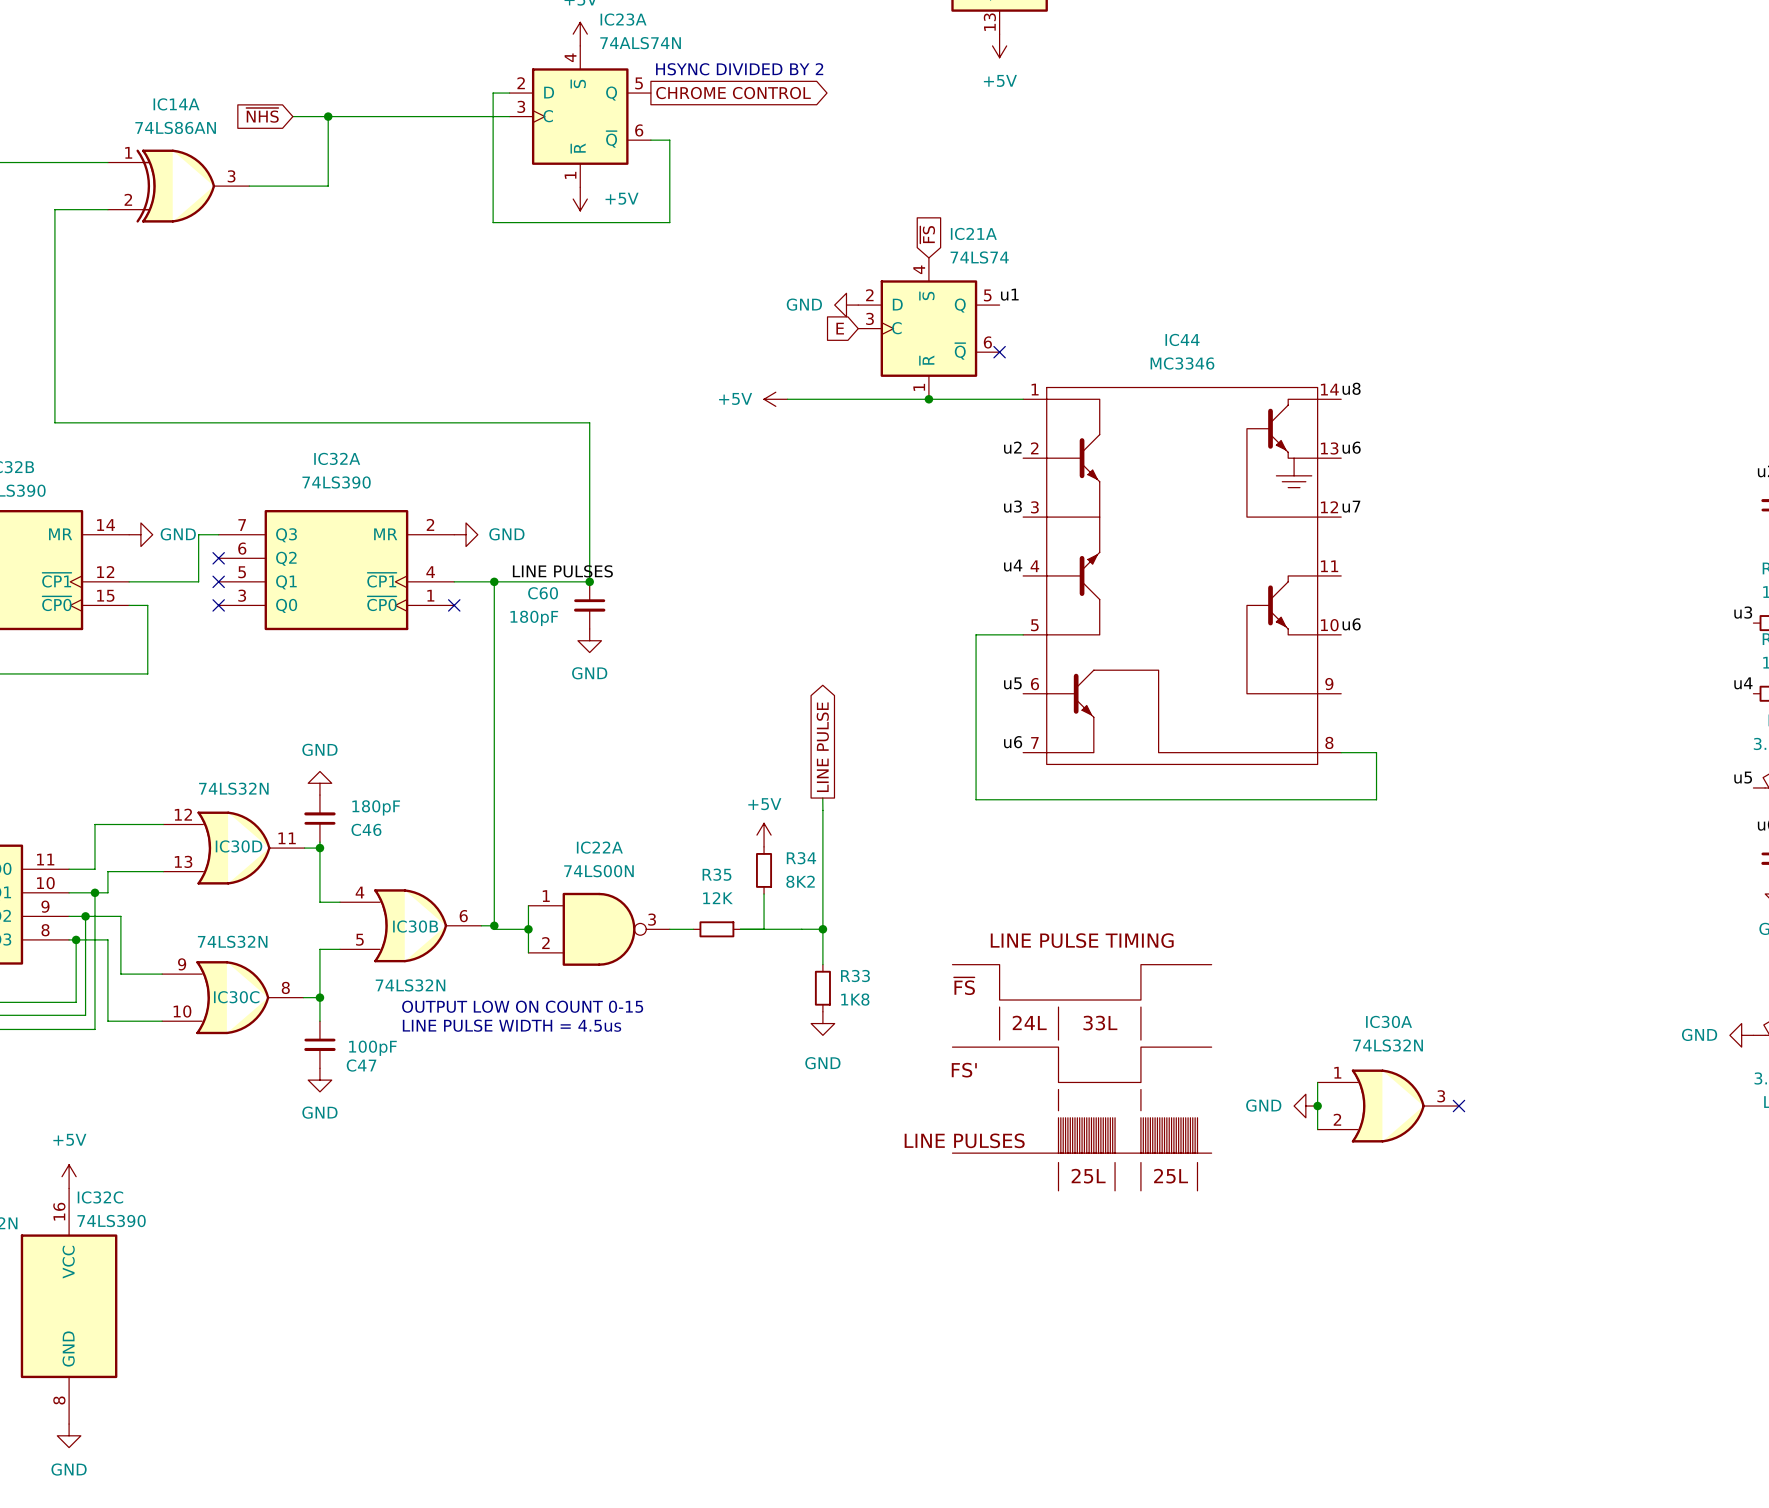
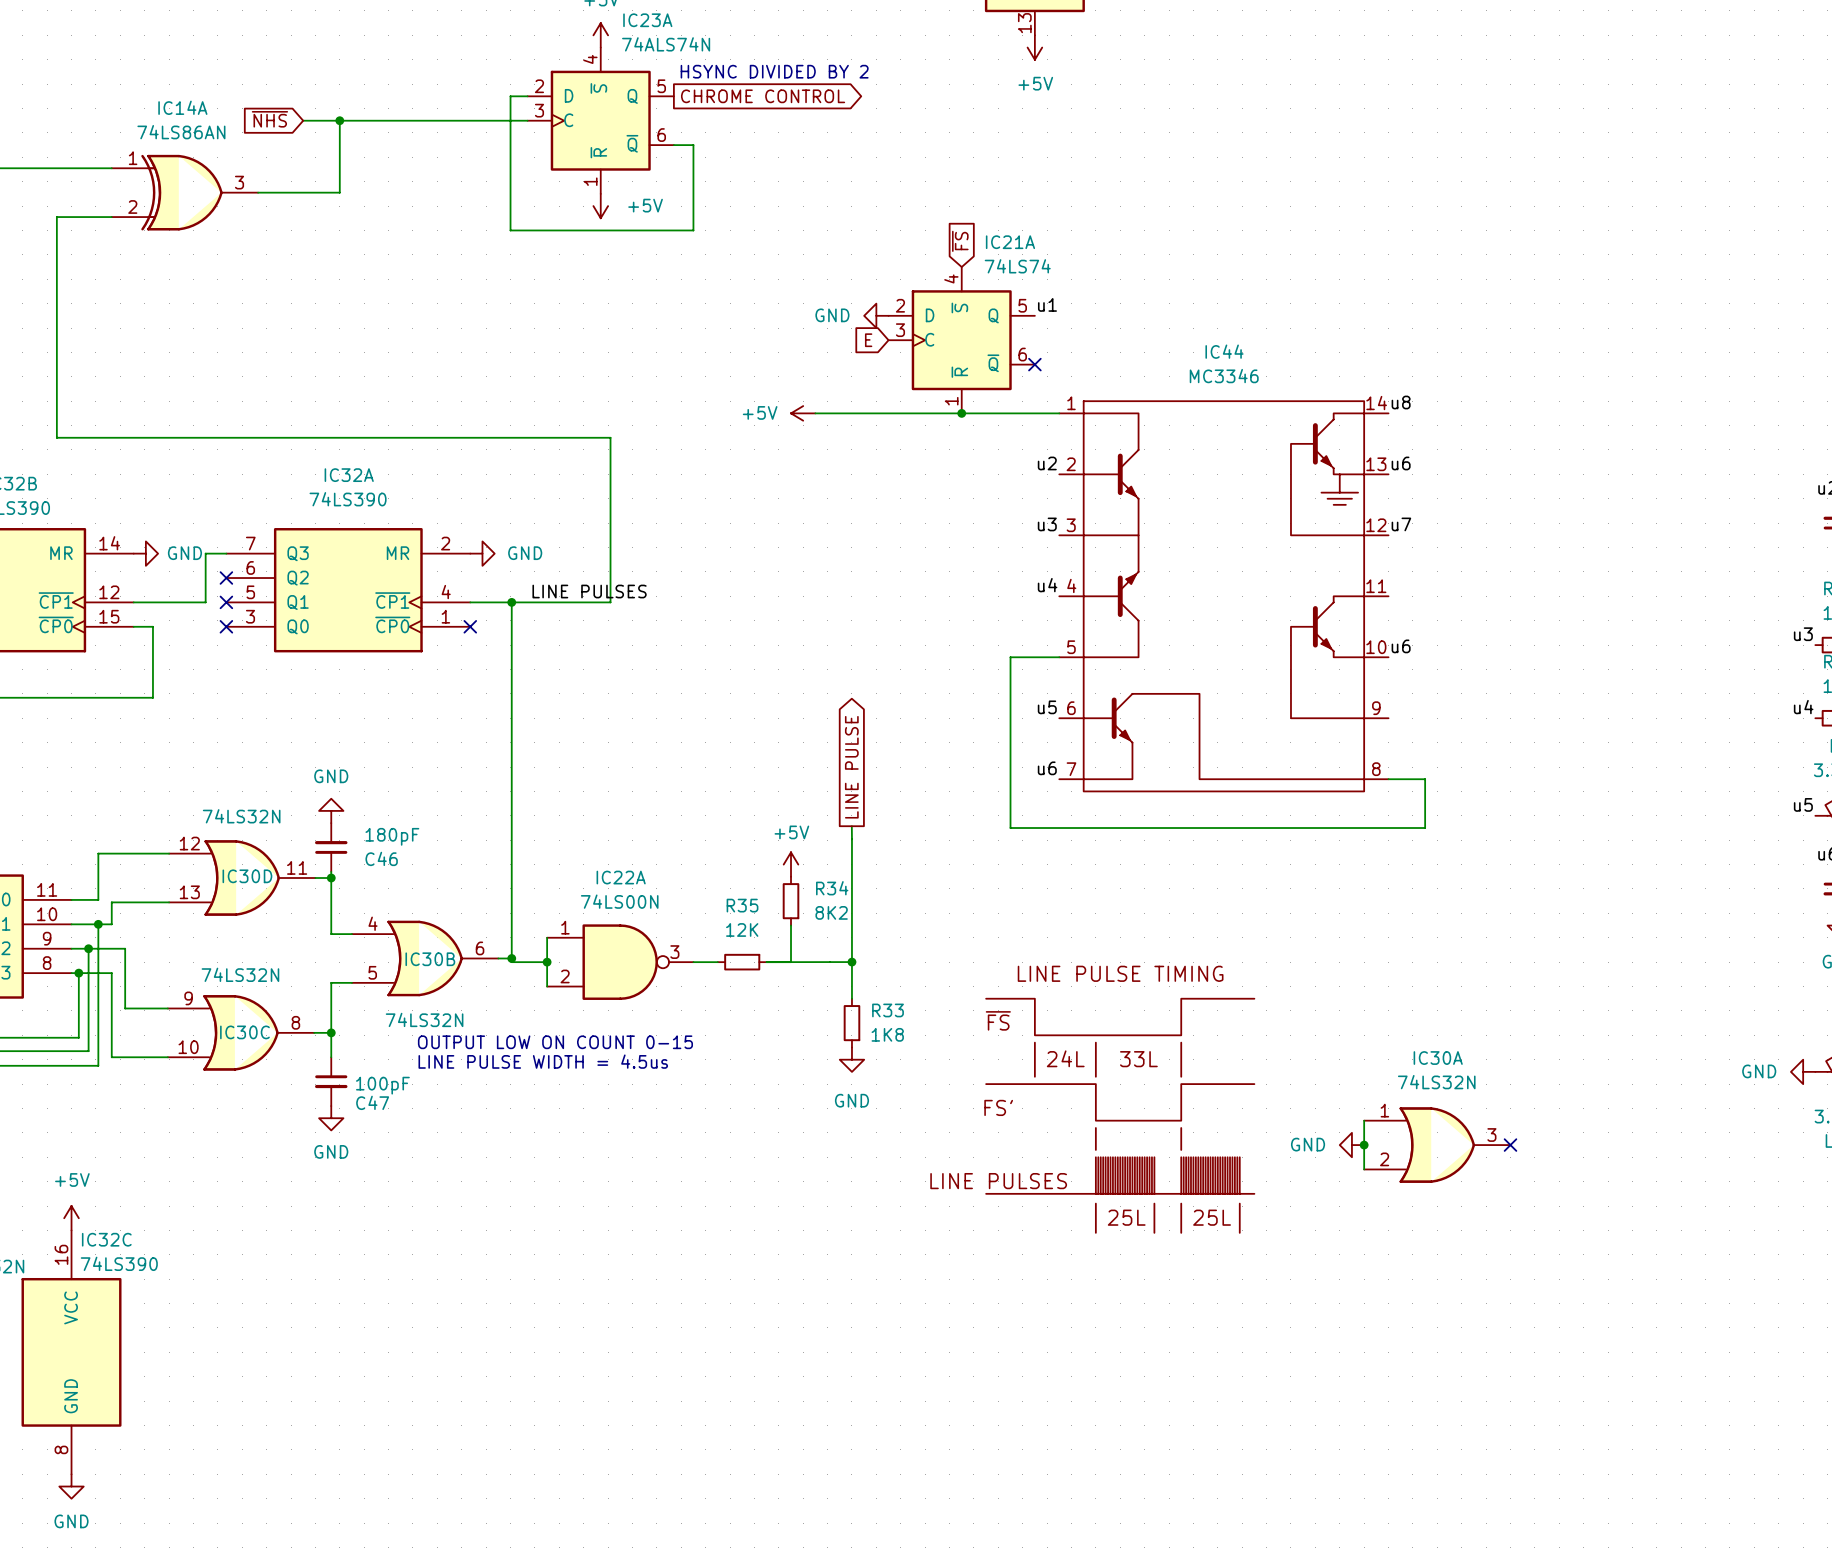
junction: (589, 581) -> none
C60: 180pF (589, 605) -> none
power symbol: GND (589, 640) -> none

